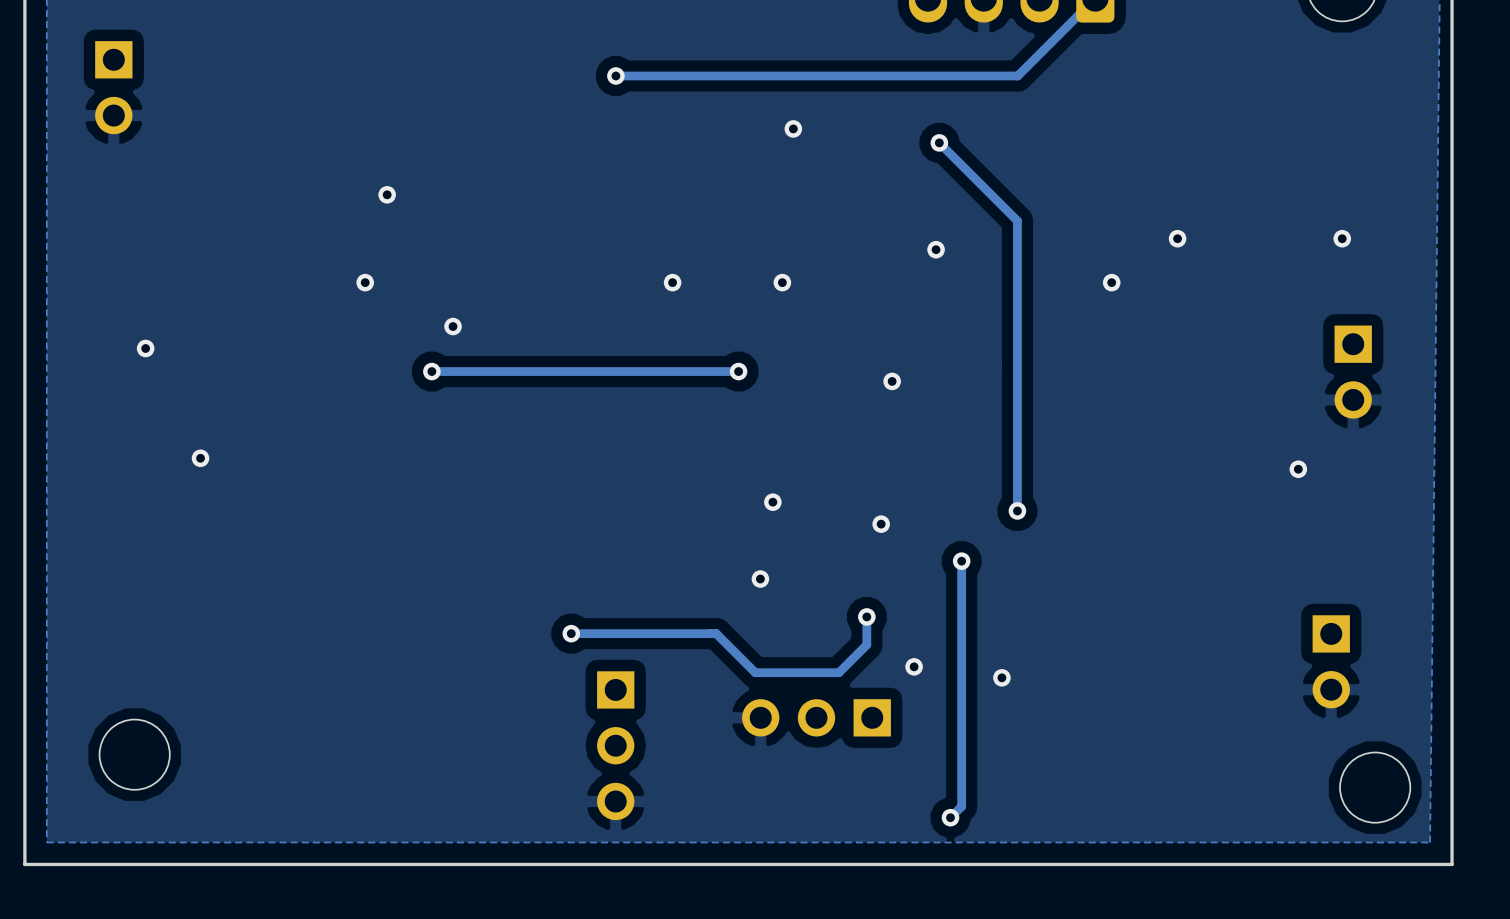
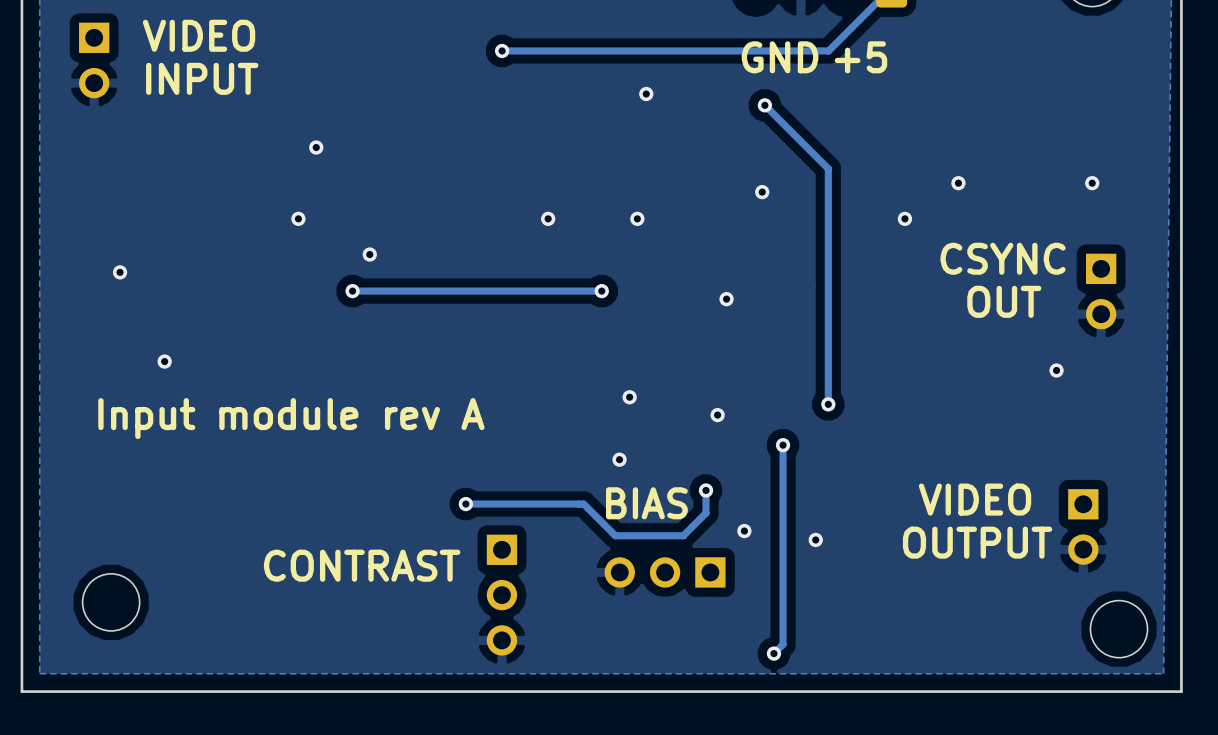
text: none -> VIDEO (199, 35)
text: none -> GND (780, 57)
text: none -> +5 (860, 57)
text: none -> INPUT (202, 78)
text: none -> CSYNC (1003, 258)
text: none -> OUT (1004, 301)
text: none -> Input module rev A (291, 418)
text: none -> VIDEO (975, 499)
text: none -> BIAS (646, 503)
text: none -> OUTPUT (977, 542)
text: none -> CONTRAST (362, 565)

